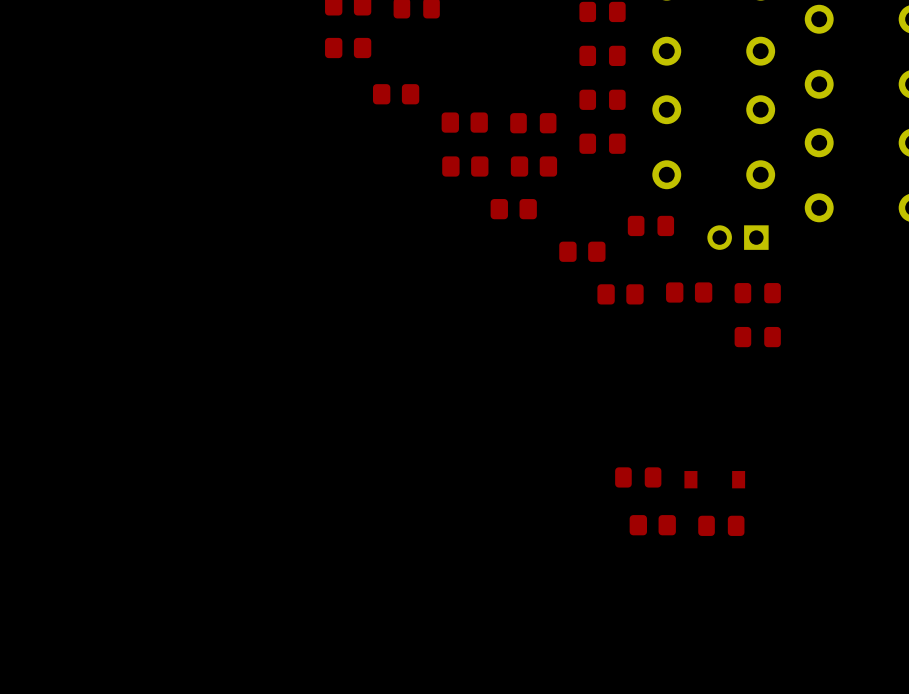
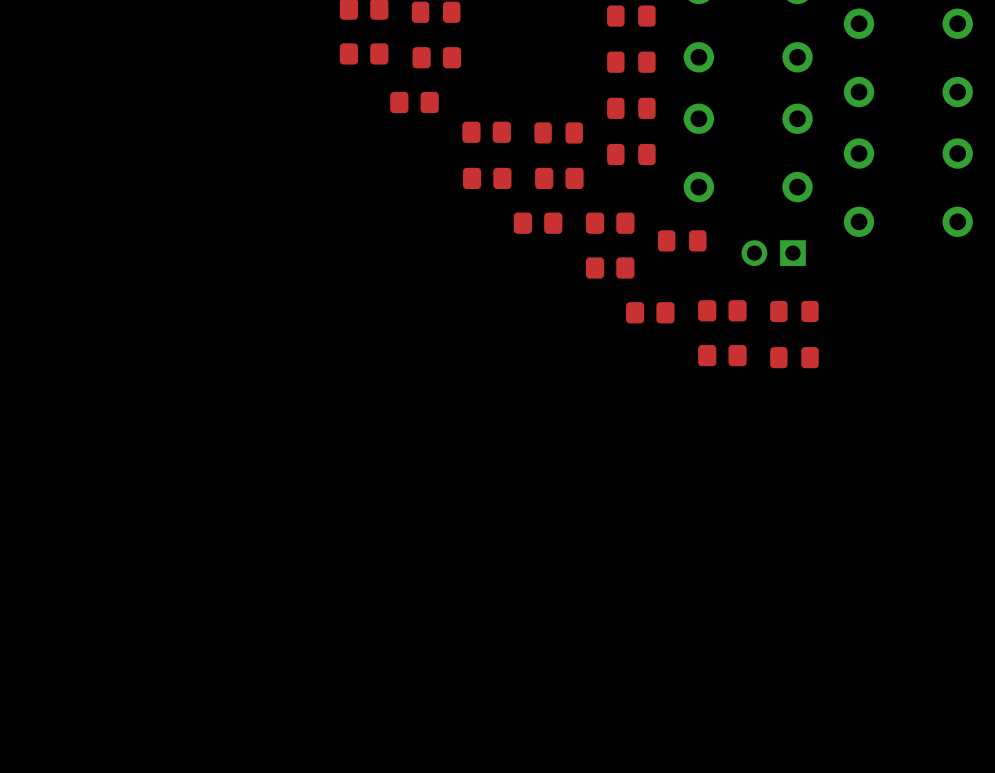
part: none -> (436, 57)
part: none -> (610, 223)
part: none -> (722, 355)
part: (638, 477) -> none
part: (714, 479) -> none
part: (652, 525) -> none
part: (721, 525) -> none

